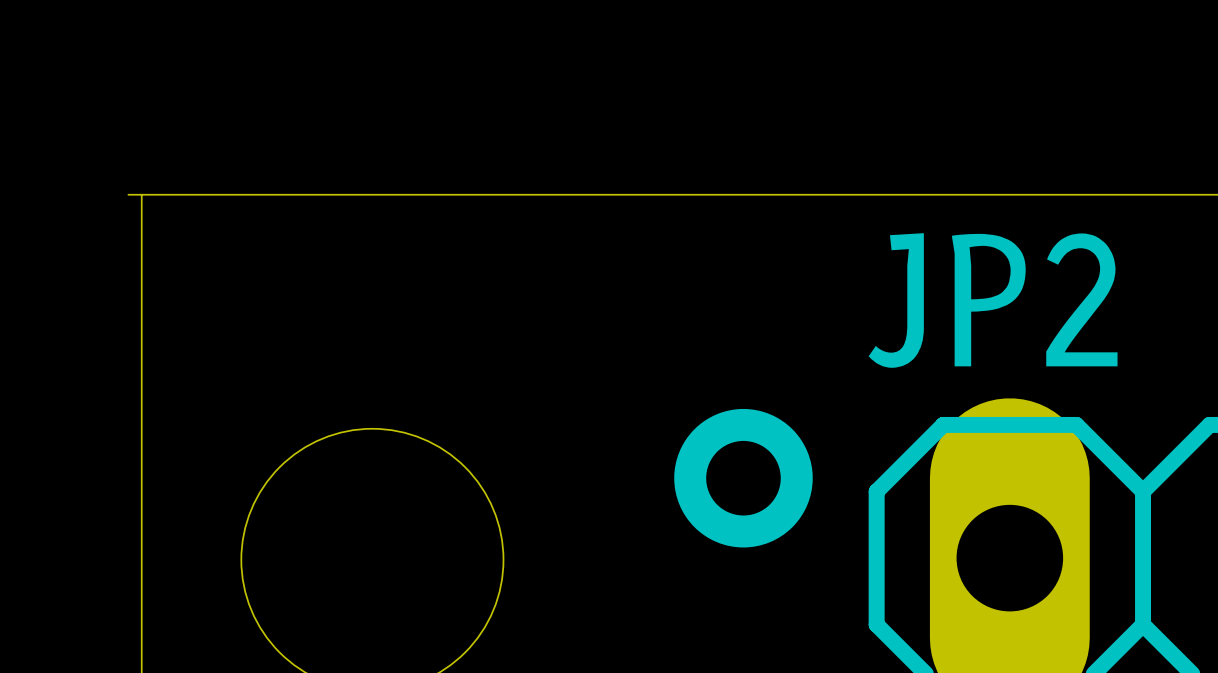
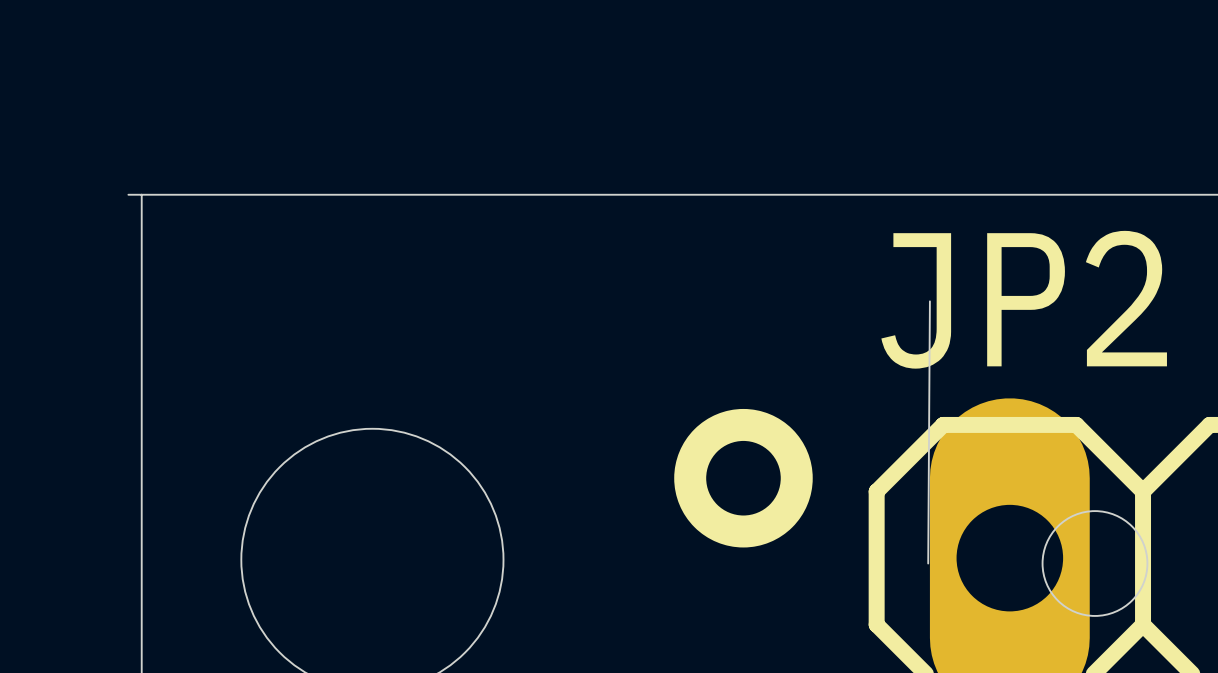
board edge: none -> (929, 301) (928, 563)
round board edge: none -> [1042, 510, 1148, 617]

